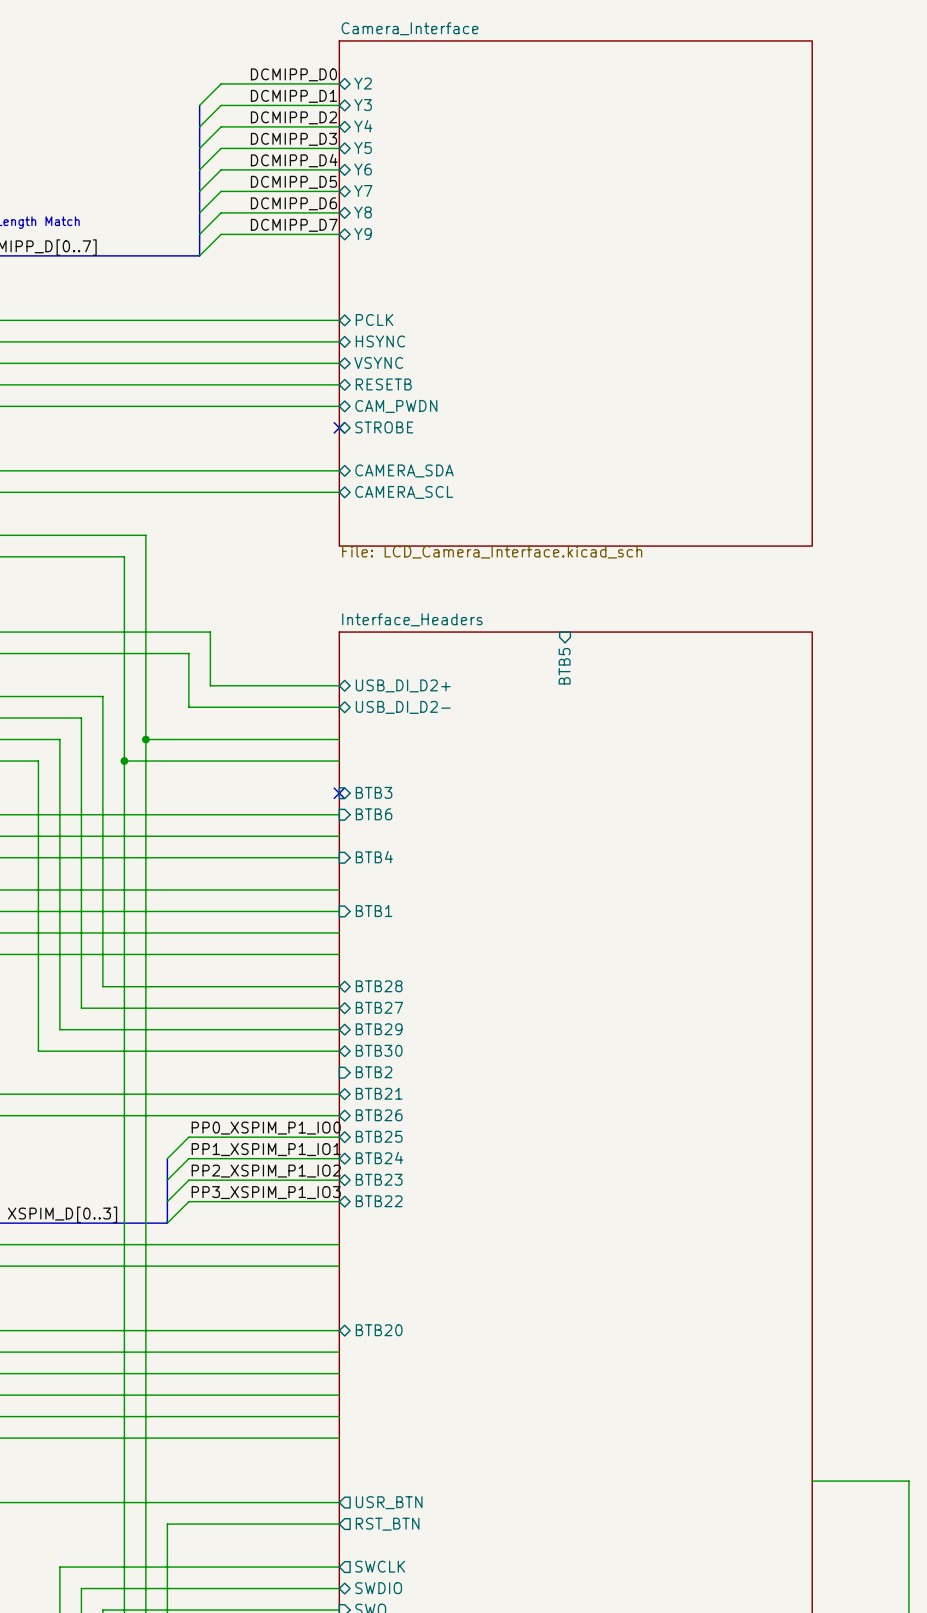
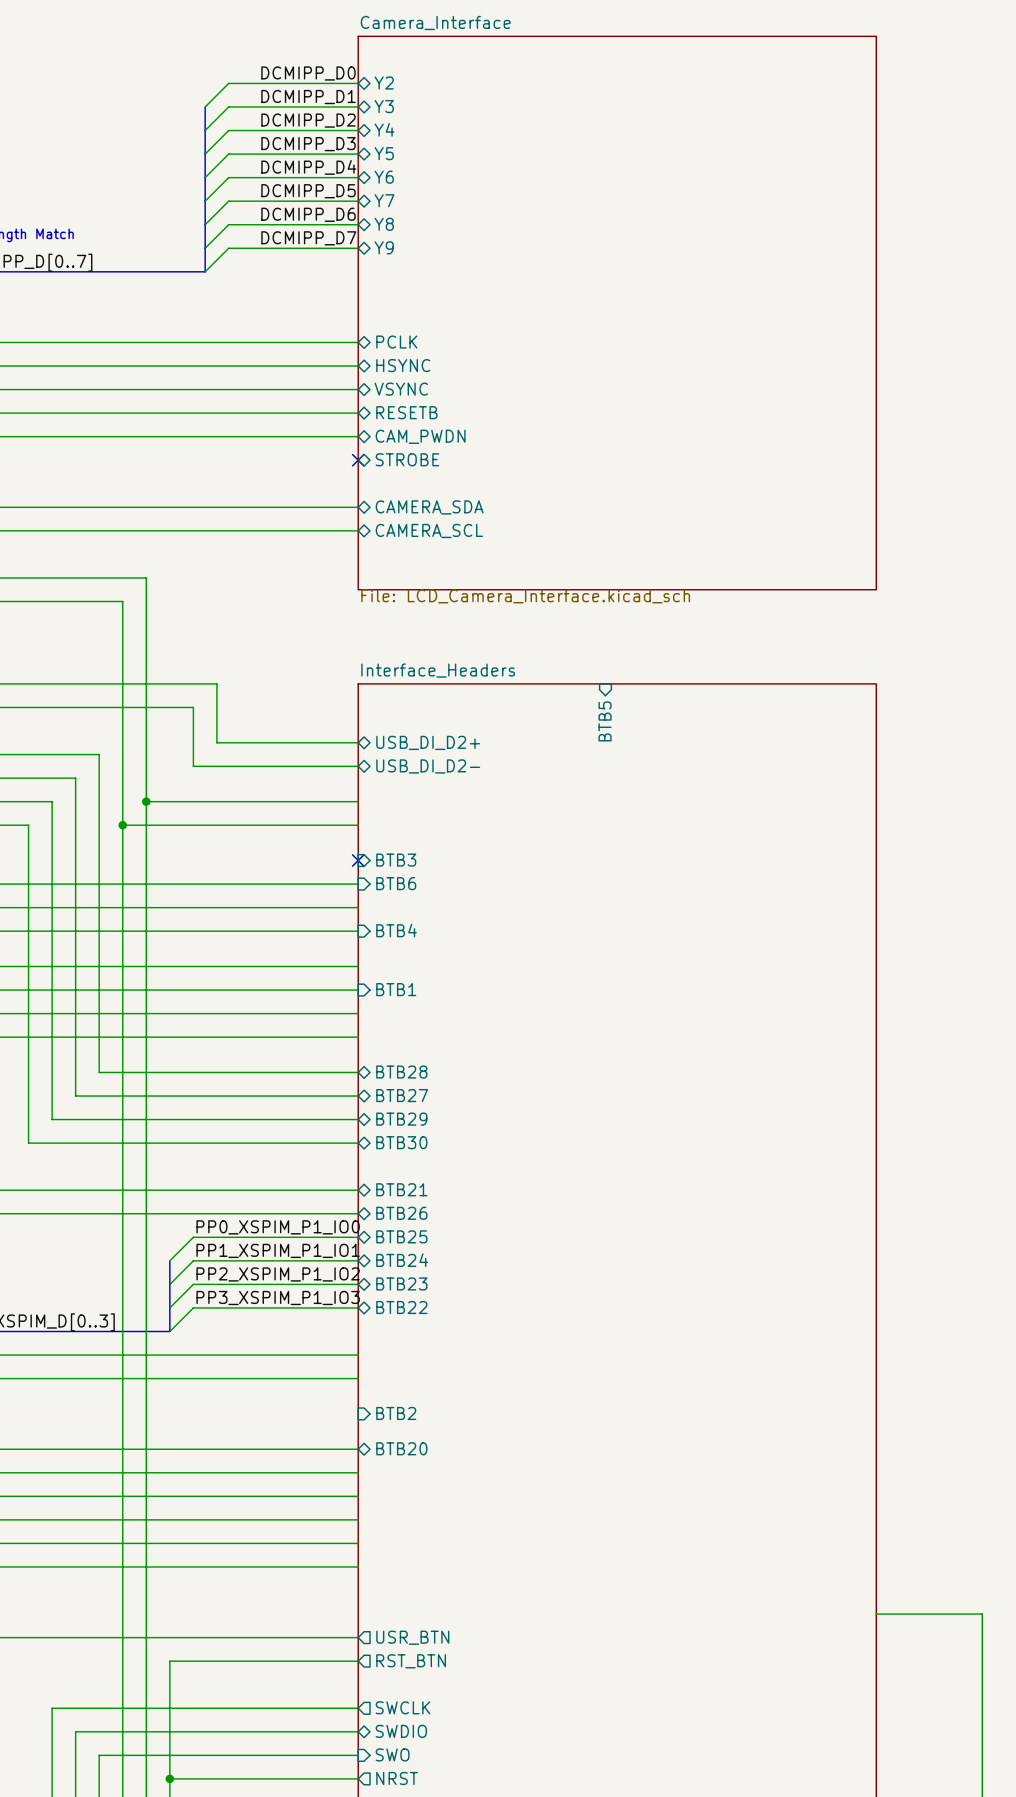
sheet pin: BTB2 (374, 1072) -> none
sheet pin: none -> BTB2 (396, 1413)

